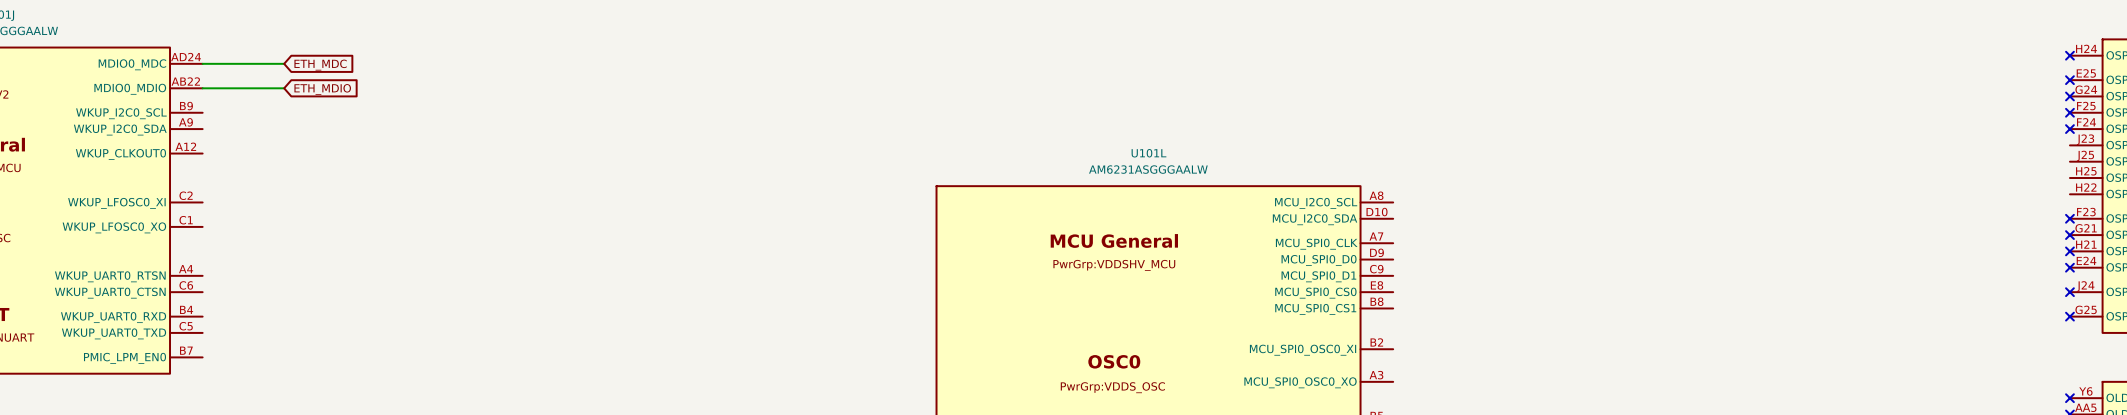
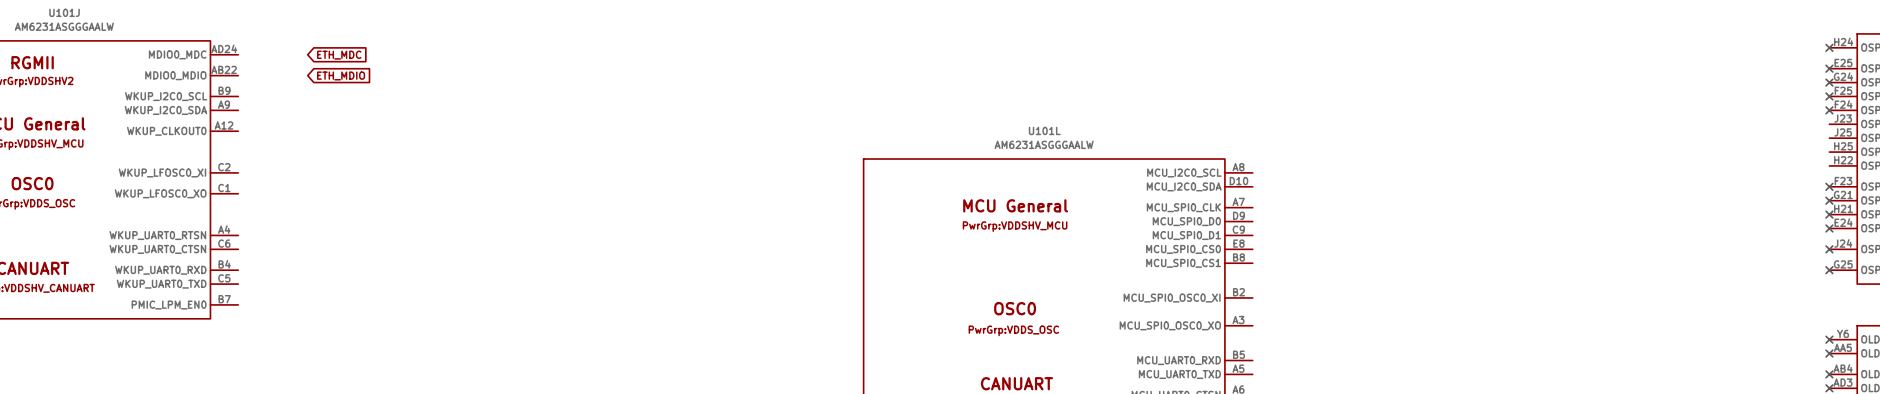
wire: (202, 63) (284, 63) -> none
wire: (202, 88) (284, 88) -> none

